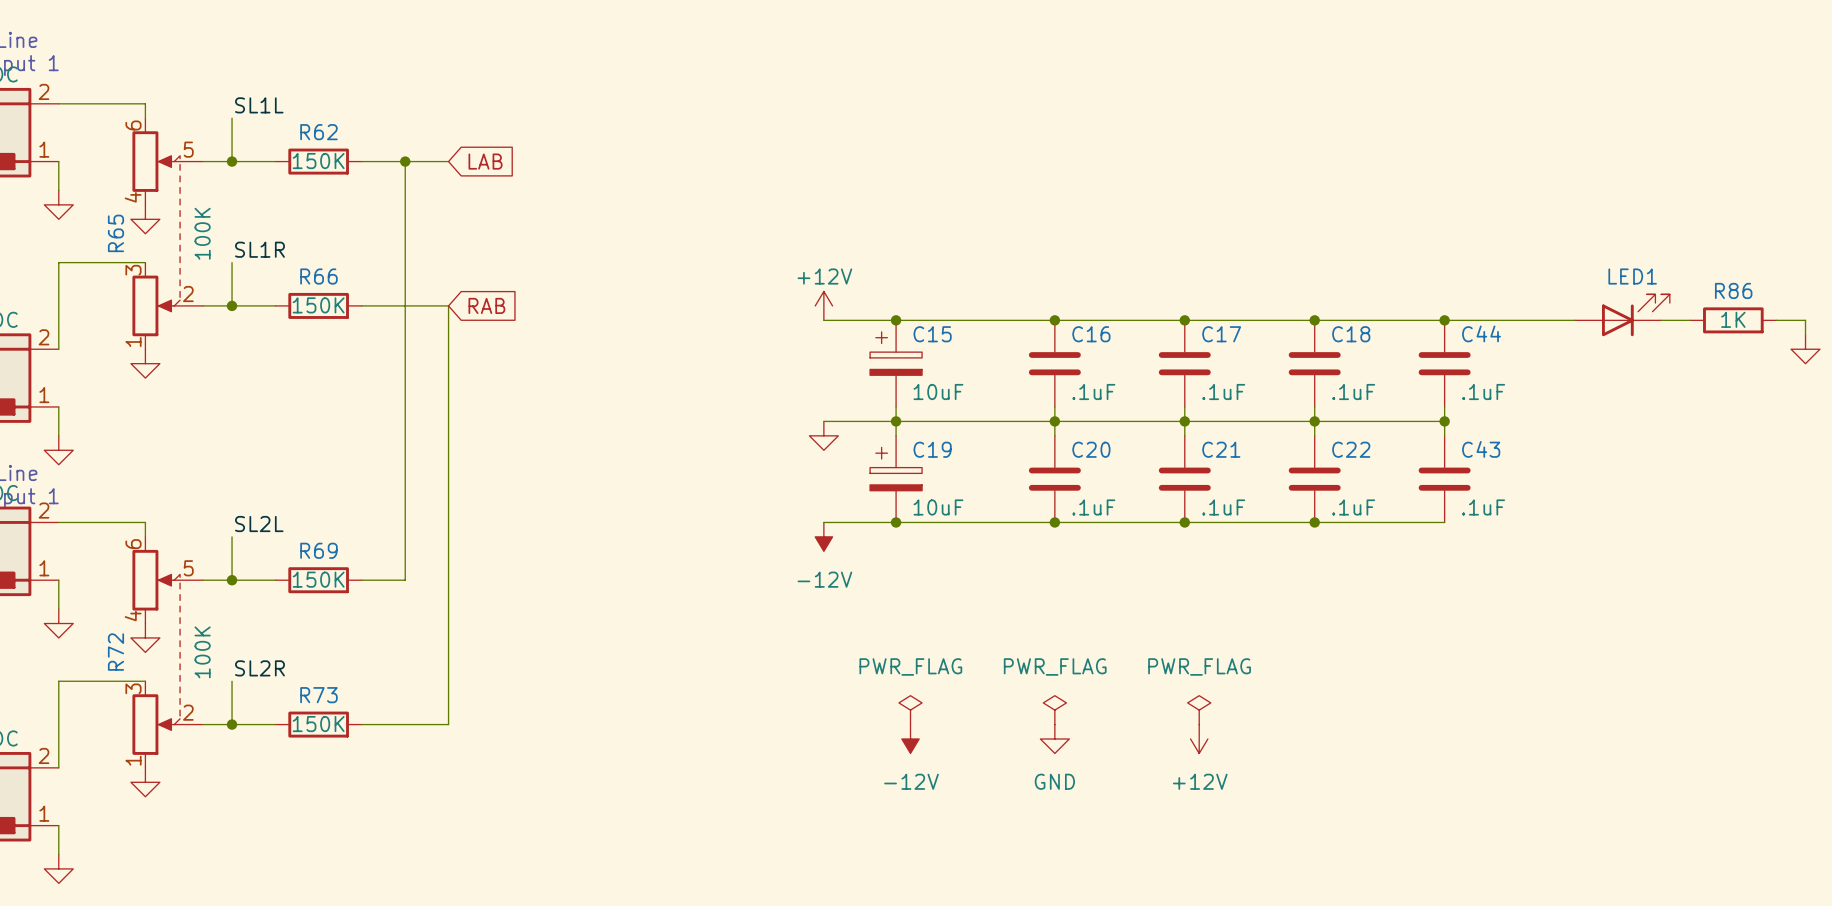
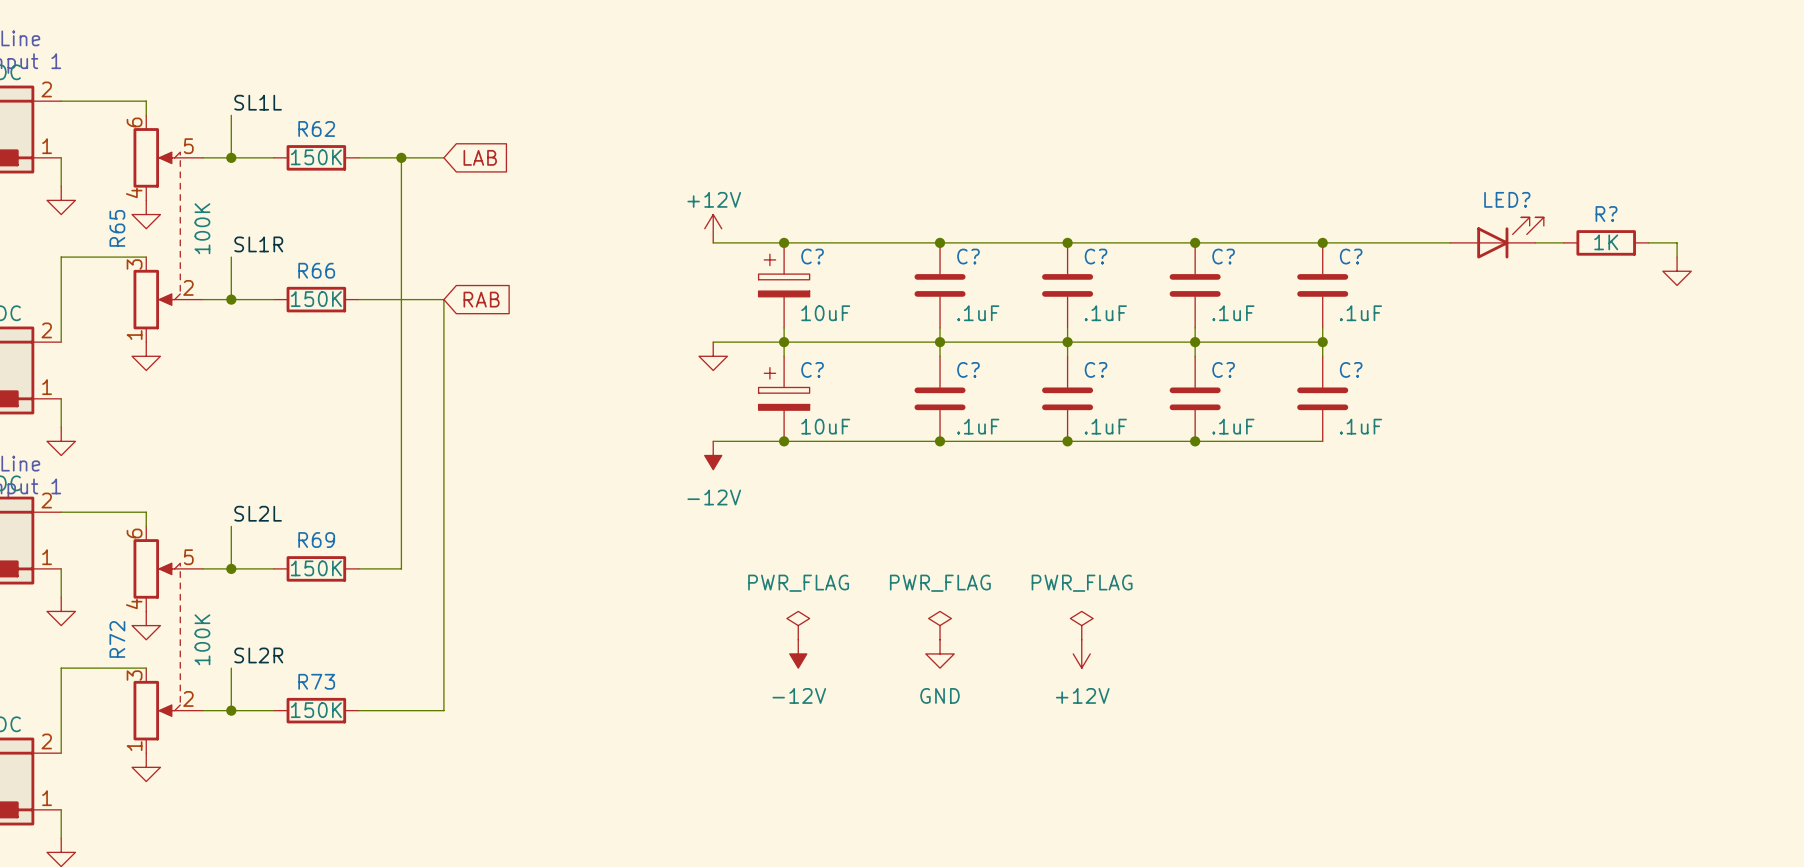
LED?: none -> (1497, 237)
junction: none -> (784, 242)
junction: none -> (940, 242)
junction: none -> (1067, 242)
junction: none -> (1195, 242)
junction: none -> (1322, 242)
R?: none -> 1K (1606, 242)
C?: none -> 10uF (784, 285)
C?: none -> .1uF (940, 285)
C?: none -> .1uF (1067, 285)
C?: none -> .1uF (1195, 285)
C?: none -> .1uF (1322, 285)
power symbol position: +12V (823, 305) -> +12V (713, 228)
LED1: (1622, 315) -> none
wire: (823, 320) (1574, 320) -> (713, 242) (1450, 242)
junction: (896, 320) -> none
junction: (1054, 320) -> none
junction: (1184, 320) -> none
junction: (1314, 320) -> none
junction: (1444, 320) -> none
wire: (1661, 320) (1690, 320) -> (1535, 242) (1563, 242)
R86: 1K (1733, 320) -> none
wire: (1776, 320) (1805, 320) (1805, 334) -> (1648, 242) (1677, 242) (1677, 257)
junction: none -> (784, 342)
junction: none -> (940, 342)
junction: none -> (1067, 342)
junction: none -> (1195, 342)
junction: none -> (1322, 342)
power symbol position: (1805, 349) -> (1677, 271)
C15: 10uF (896, 363) -> none
C16: .1uF (1054, 363) -> none
C17: .1uF (1184, 363) -> none
C18: .1uF (1314, 363) -> none
C44: .1uF (1444, 363) -> none
C?: none -> 10uF (784, 398)
wire: (896, 406) (896, 435) -> (784, 327) (784, 356)
C?: none -> .1uF (940, 398)
wire: (1054, 406) (1054, 435) -> (940, 327) (940, 356)
C?: none -> .1uF (1067, 398)
wire: (1184, 406) (1184, 435) -> (1067, 327) (1067, 356)
C?: none -> .1uF (1195, 398)
wire: (1314, 406) (1314, 435) -> (1195, 327) (1195, 356)
C?: none -> .1uF (1322, 398)
wire: (1444, 406) (1444, 435) -> (1322, 327) (1322, 356)
wire: (823, 421) (1444, 421) -> (713, 342) (1322, 342)
junction: (896, 421) -> none
junction: (1054, 421) -> none
junction: (1184, 421) -> none
junction: (1314, 421) -> none
junction: (1444, 421) -> none
power symbol position: (823, 435) -> (713, 356)
junction: none -> (784, 441)
junction: none -> (940, 441)
junction: none -> (1067, 441)
junction: none -> (1195, 441)
power symbol: none -> -12V (713, 455)
C19: 10uF (896, 479) -> none
C20: .1uF (1054, 479) -> none
C21: .1uF (1184, 479) -> none
C22: .1uF (1314, 479) -> none
C43: .1uF (1444, 479) -> none
wire: (823, 522) (1444, 522) -> (713, 441) (1322, 441)
junction: (896, 522) -> none
junction: (1054, 522) -> none
junction: (1184, 522) -> none
junction: (1314, 522) -> none
power symbol: -12V (823, 536) -> none
power symbol: none -> PWR_FLAG (798, 625)
power symbol: none -> PWR_FLAG (940, 625)
power symbol: none -> PWR_FLAG (1081, 625)
power symbol: none -> -12V (798, 653)
power symbol: PWR_FLAG (910, 710) -> none
power symbol: PWR_FLAG (1054, 710) -> none
power symbol: PWR_FLAG (1199, 710) -> none
power symbol: -12V (910, 739) -> none
power symbol position: GND (1054, 739) -> GND (940, 653)
power symbol position: +12V (1199, 739) -> +12V (1081, 653)

